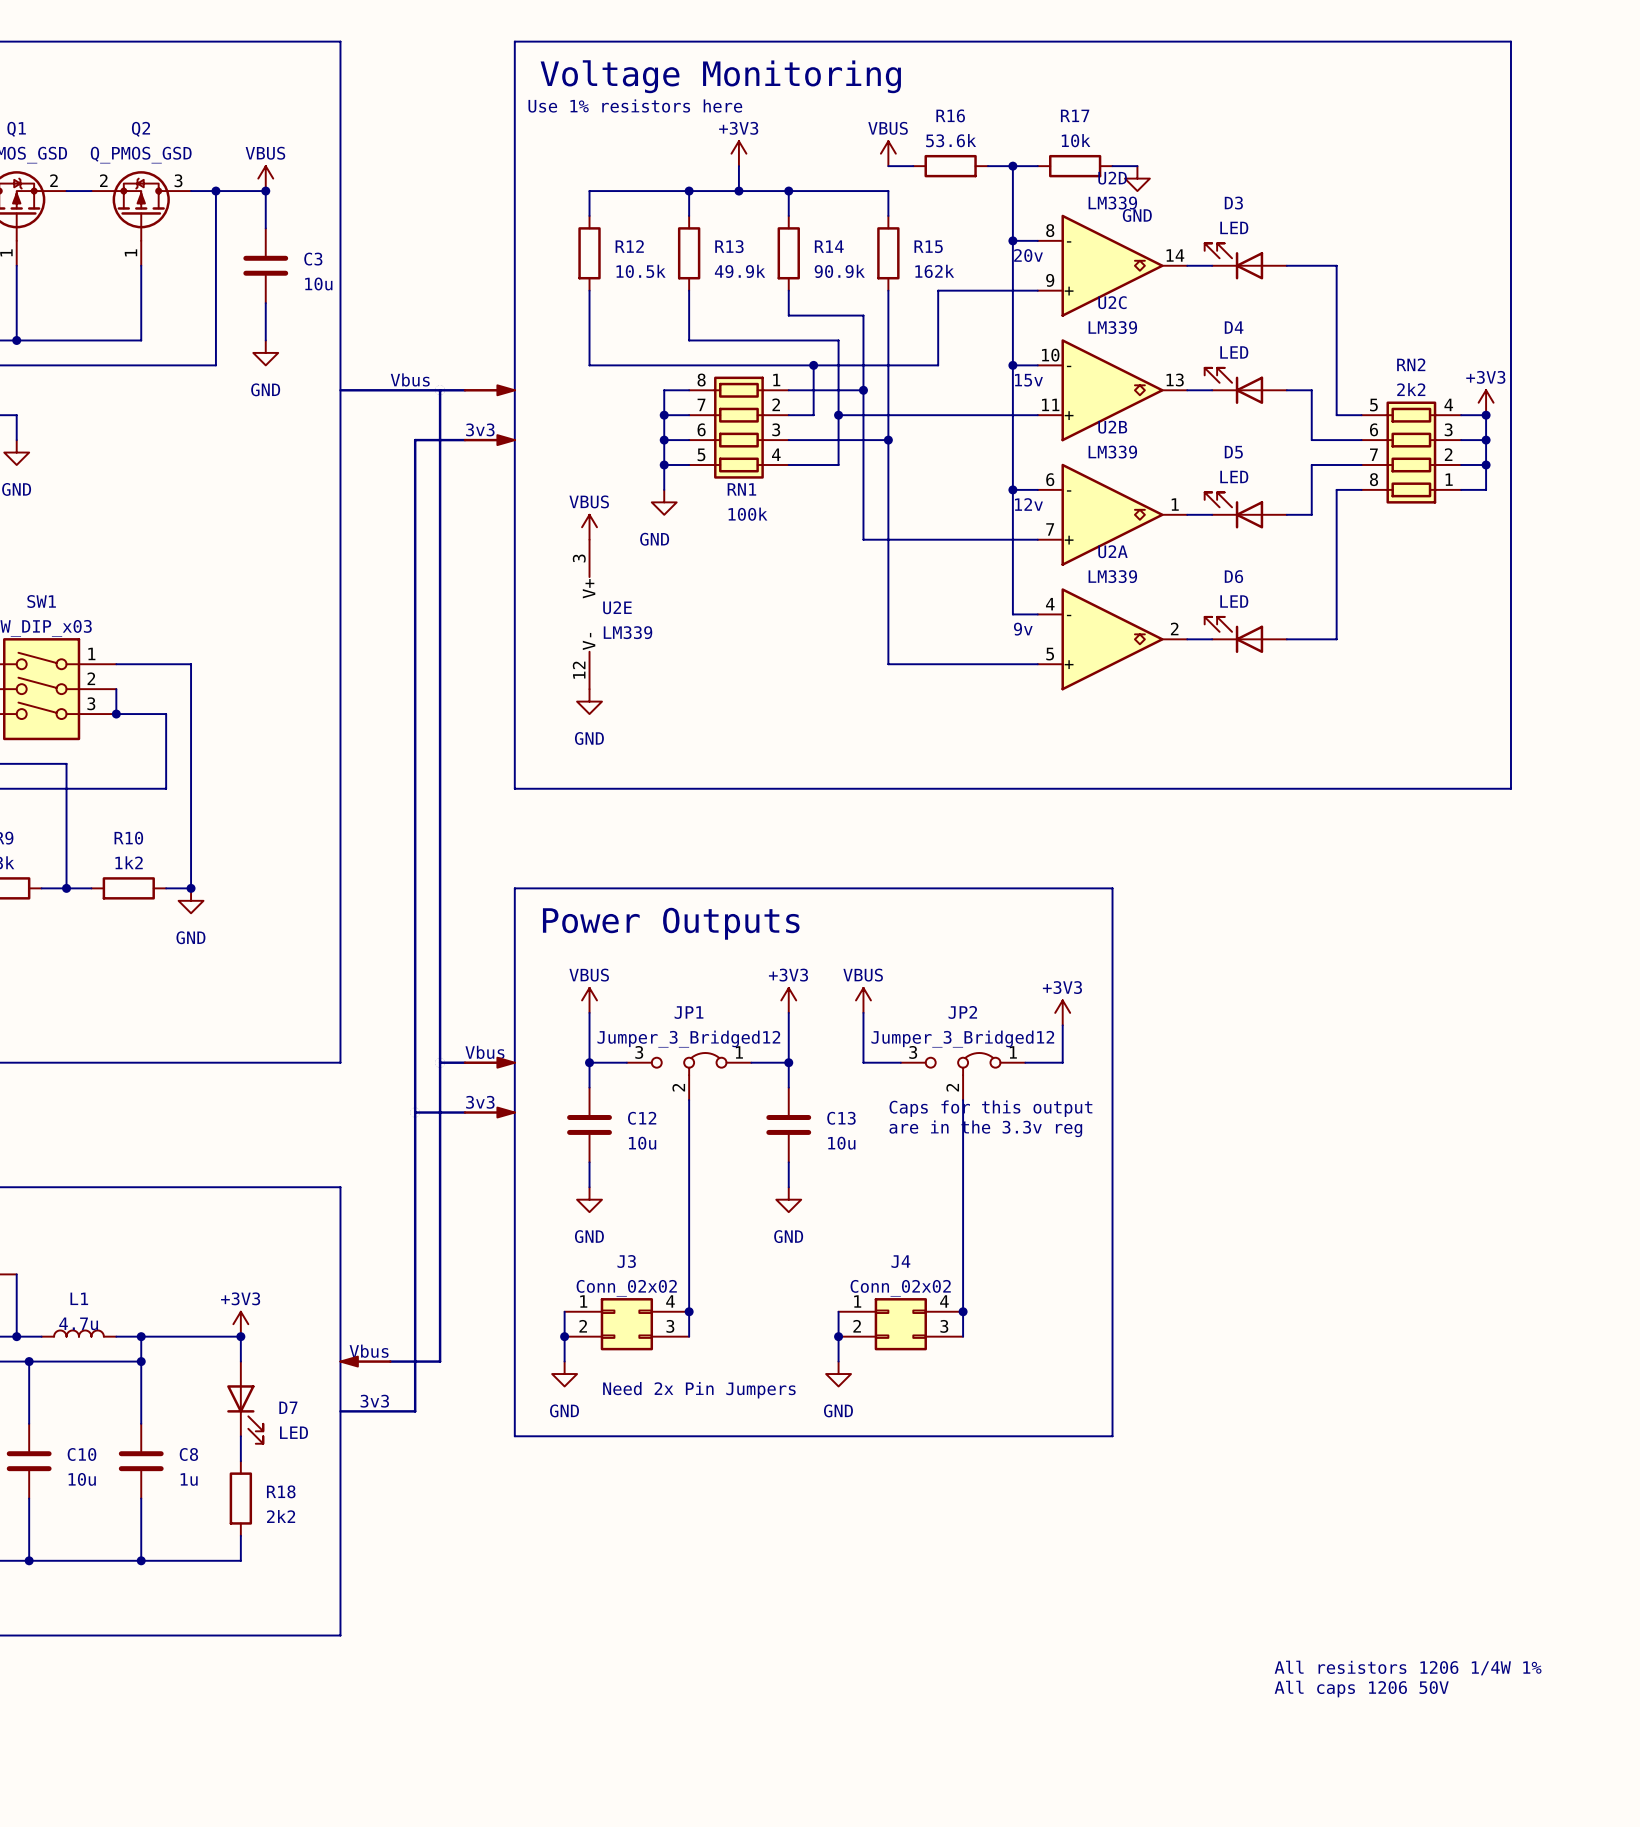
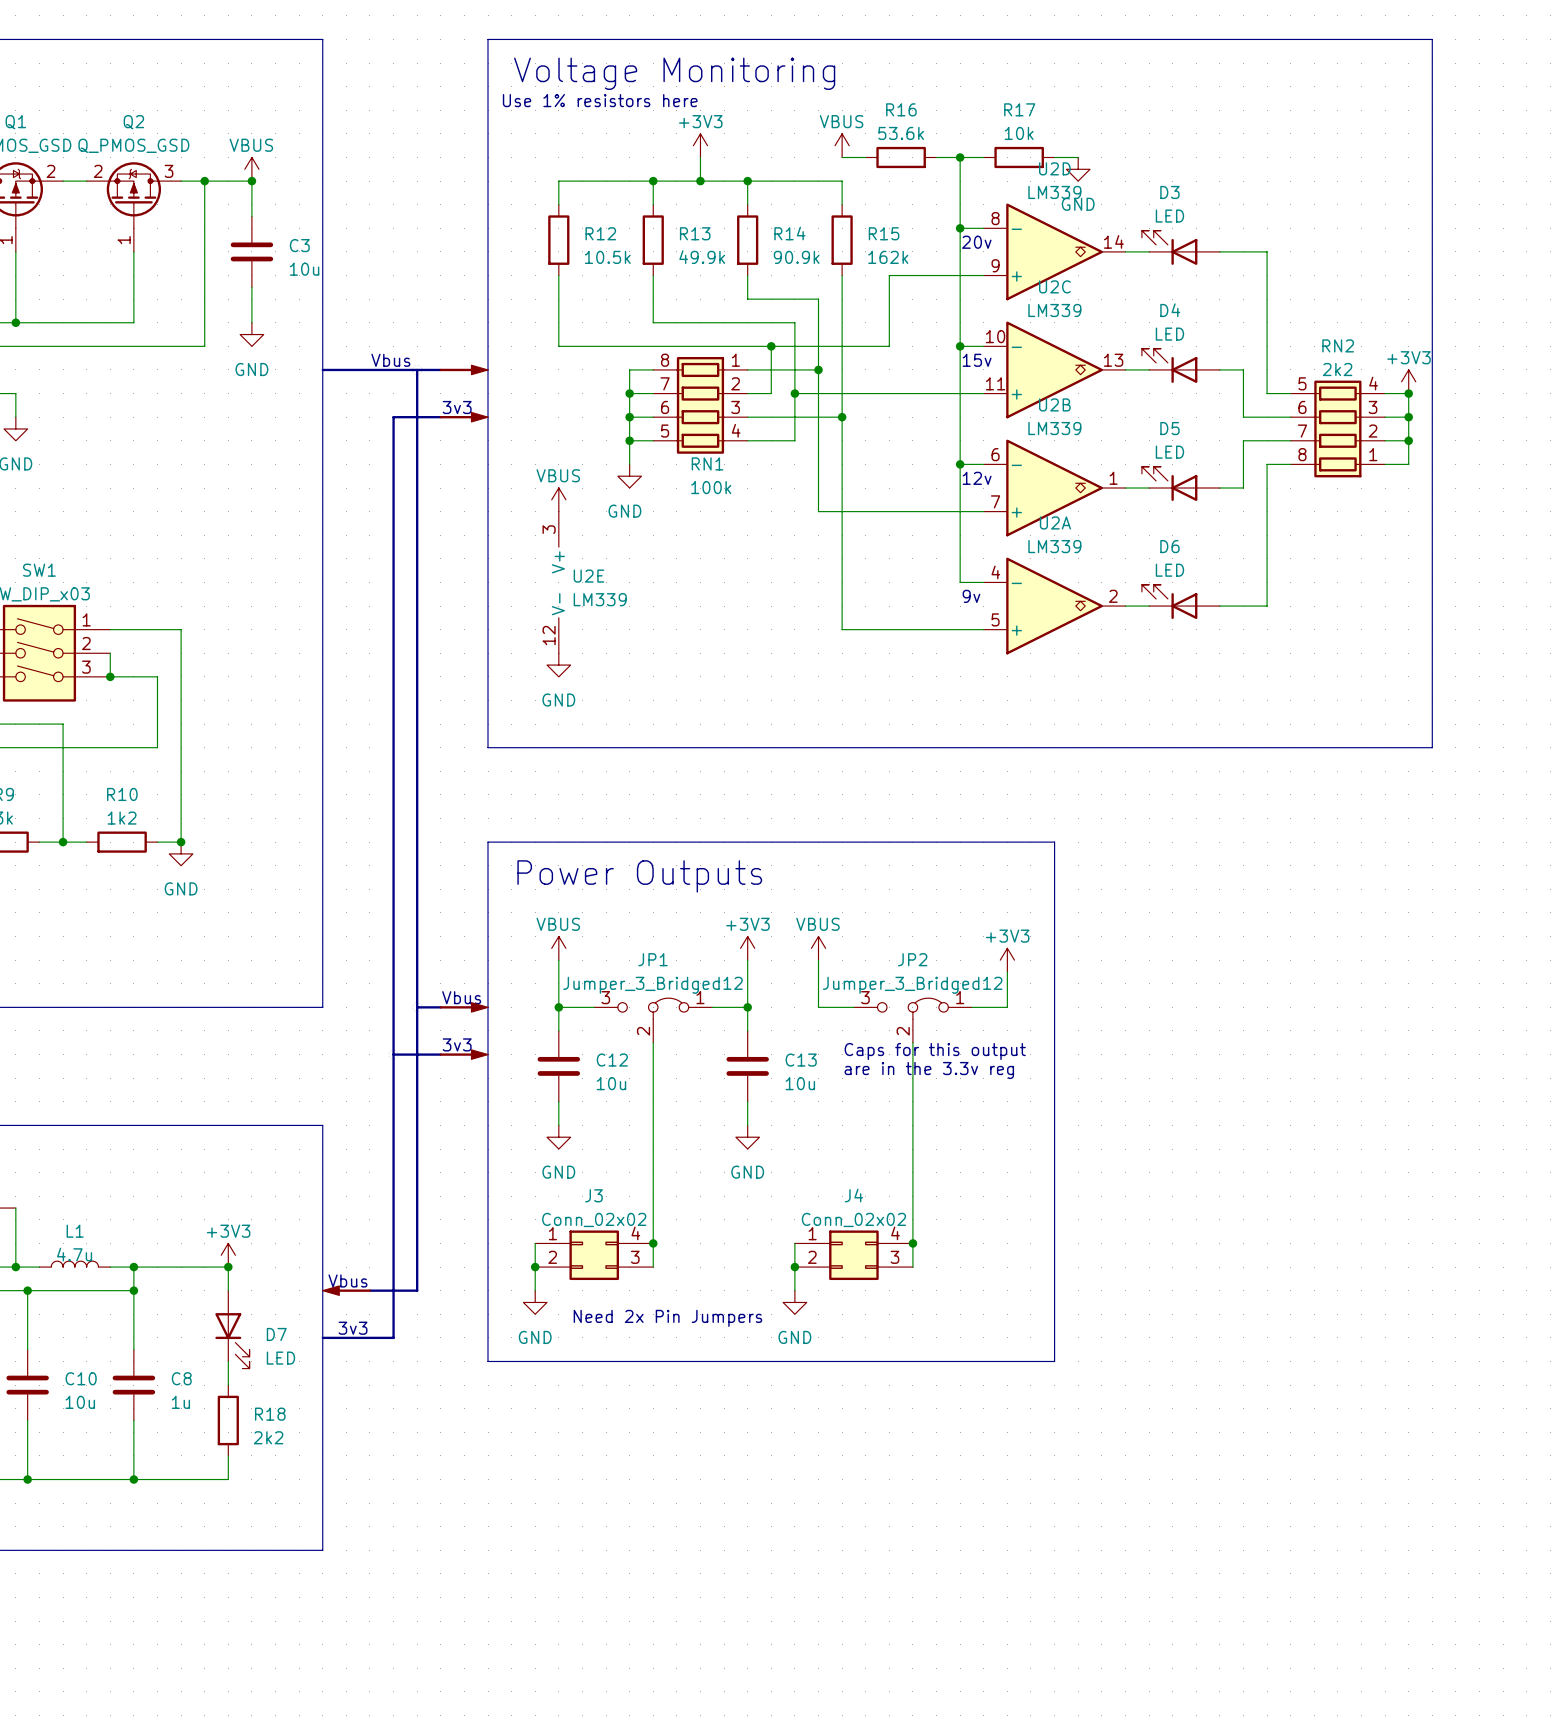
text: All resistors 1206 1/4W 1% (1408, 1668) -> none
text: All caps 1206 50V (1361, 1689) -> none

